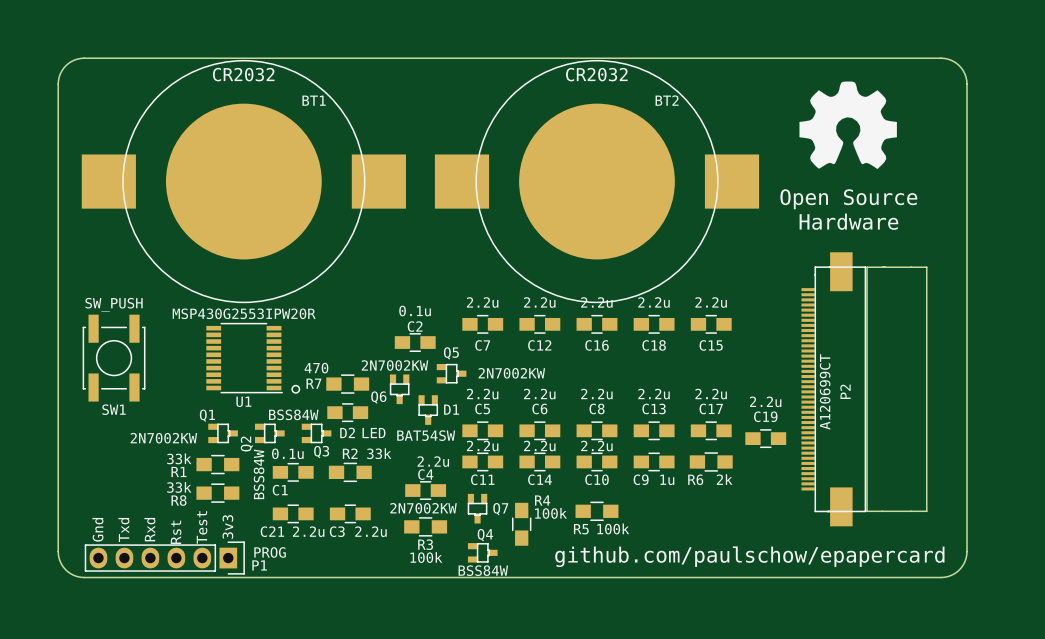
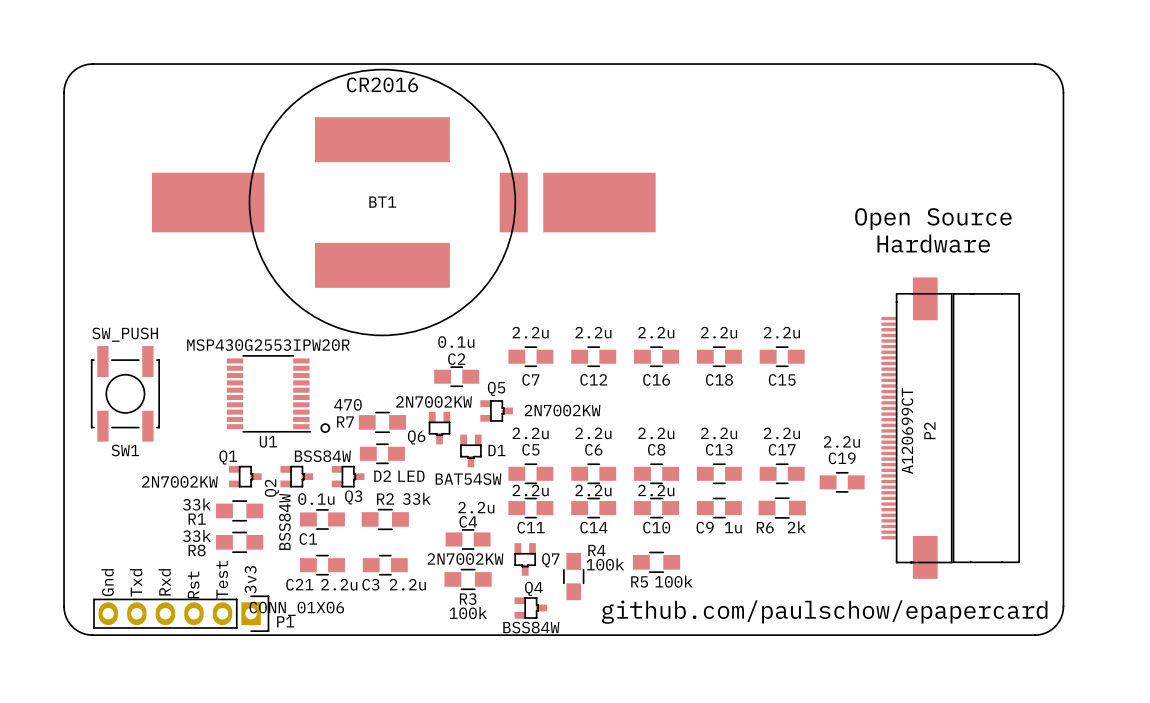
BT1 footprint: [81, 59, 406, 304] -> [152, 68, 656, 337]
BT1 value: CR2032 (243, 74) -> CR2016 (382, 84)
drawing: [799, 81, 897, 170] -> none
BT1 name position: BT1 (314, 100) -> BT1 (382, 202)
BT2: CR2032 (596, 181) -> none
P1 value: PROG (270, 552) -> CONN_01X06 (296, 608)

